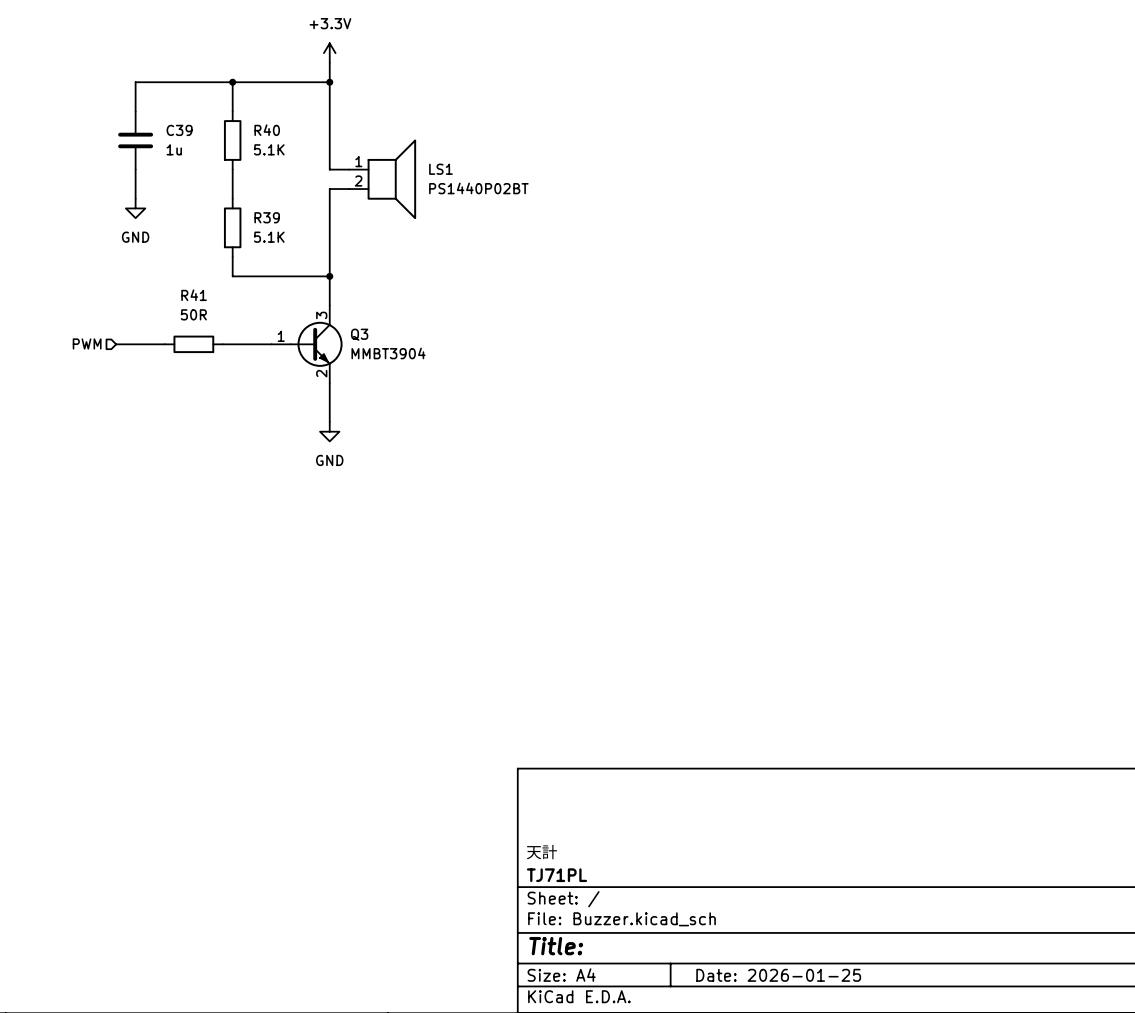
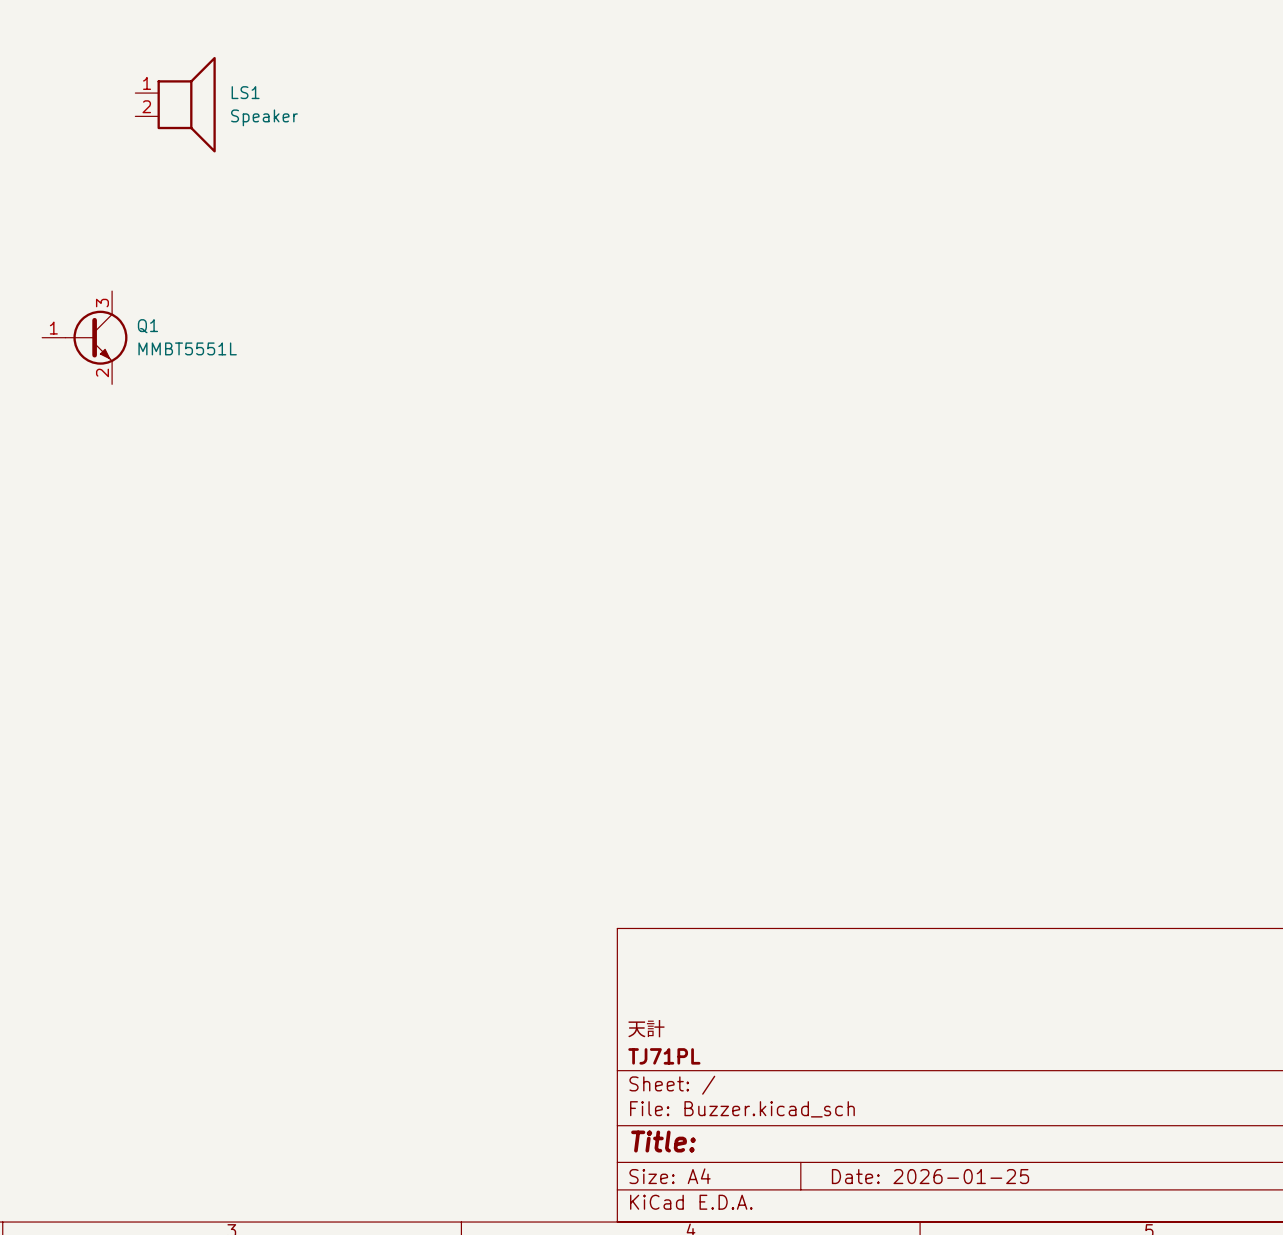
power symbol: +3.3V (329, 53) -> none
wire: (329, 62) (329, 169) (349, 169) -> none
wire: (232, 82) (232, 111) -> none
junction: (232, 82) -> none
wire: (329, 82) (135, 82) (135, 111) -> none
junction: (329, 82) -> none
C39: 1u (135, 140) -> none
R40: 5.1K (232, 140) -> none
wire: (135, 169) (135, 198) -> none
wire: (232, 169) (232, 198) -> none
LS1 position: (382, 179) -> (175, 104)
LS1 value: PS1440P02BT (478, 188) -> Speaker (264, 117)
wire: (349, 189) (329, 189) (329, 305) -> none
power symbol: GND (135, 208) -> none
R39: 5.1K (232, 227) -> none
wire: (232, 256) (232, 276) (329, 276) -> none
Q1: none -> MMBT5551L (84, 337)
junction: (329, 276) -> none
hierarchical label: PWM (87, 343) -> none
wire: (116, 344) (164, 344) -> none
R41: 50R (193, 344) -> none
wire: (222, 344) (271, 344) -> none
Q3: MMBT3904 (307, 344) -> none
wire: (329, 383) (329, 421) -> none
power symbol: GND (329, 431) -> none

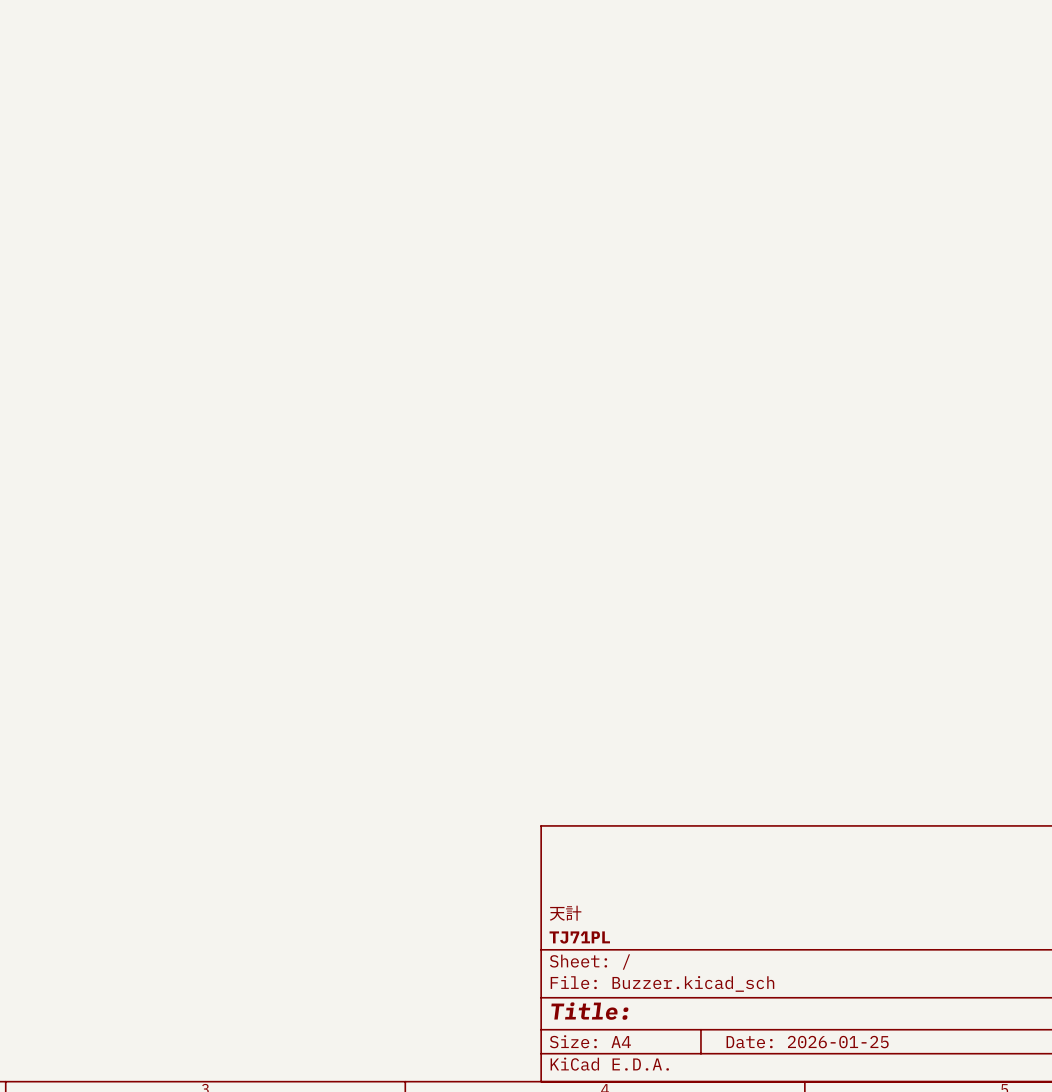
LS1: Speaker (175, 104) -> none
Q1: MMBT5551L (84, 337) -> none

